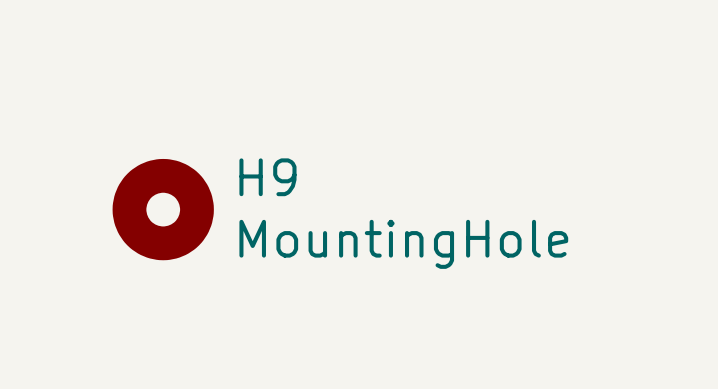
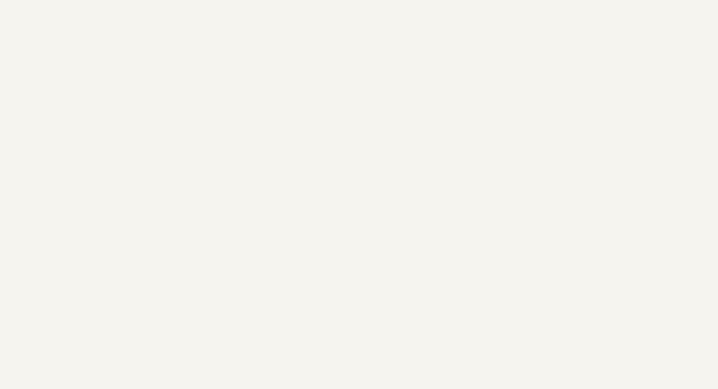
H9: MountingHole (163, 209) -> none

